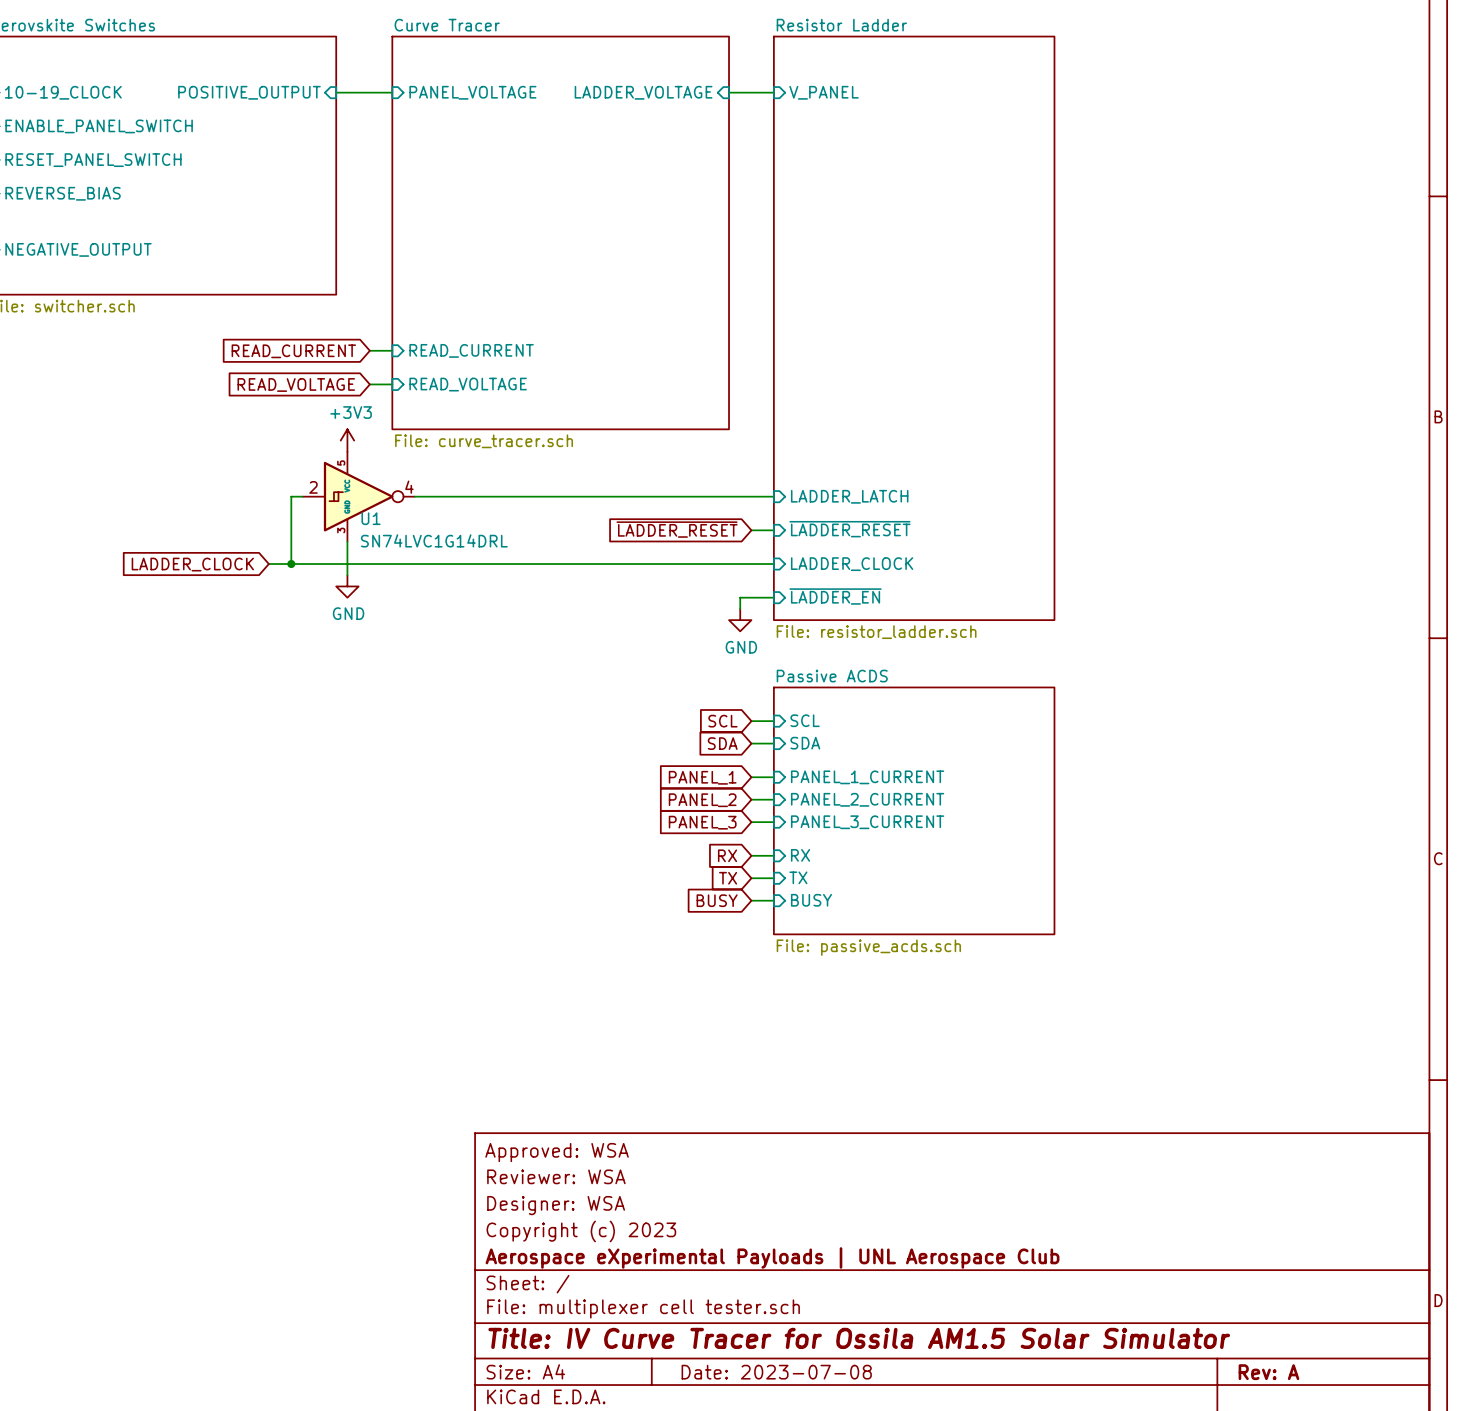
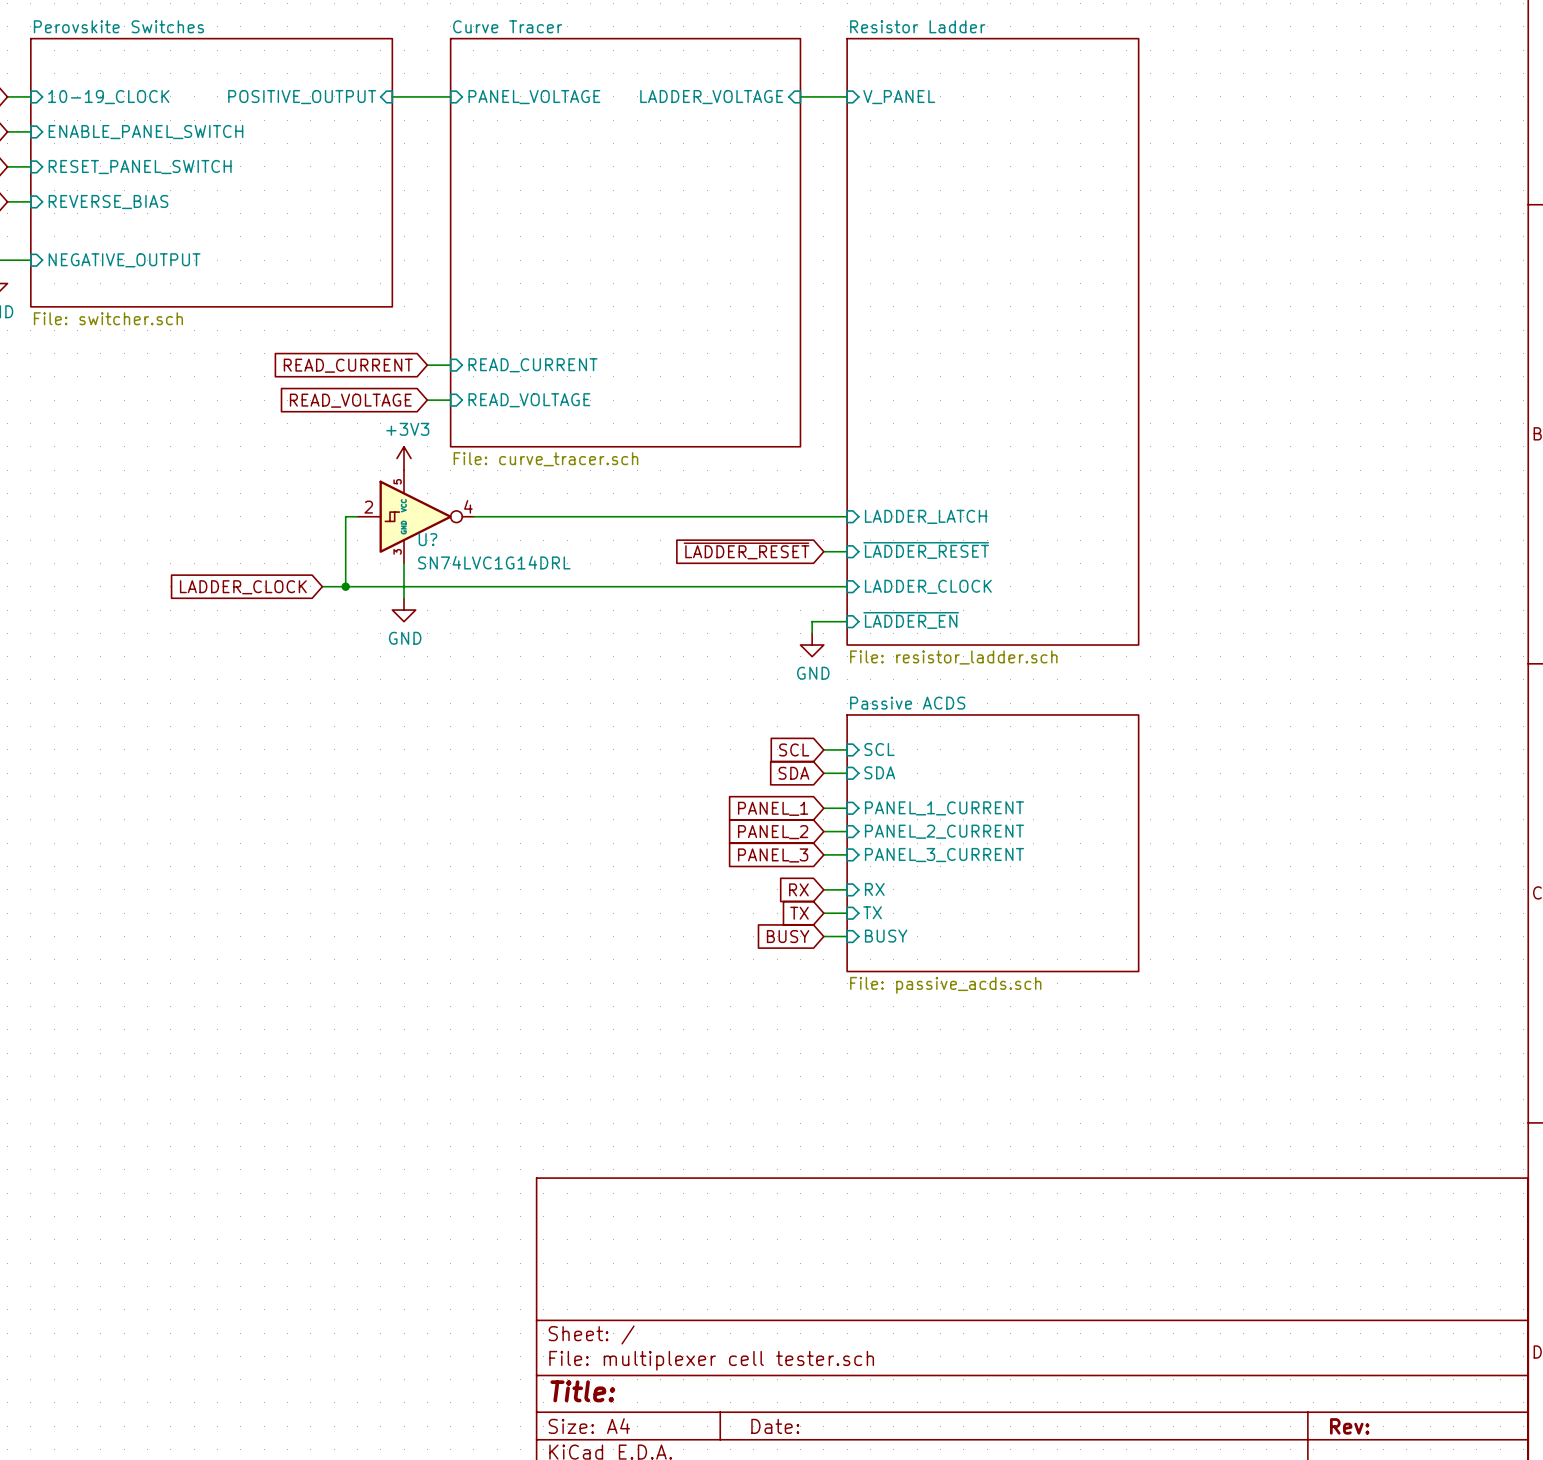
U1 name: U1 (371, 518) -> U? (427, 539)
title block: Approved: WSA (557, 1152) -> none
title block: Reviewer: WSA (556, 1176) -> none
title block: Designer: WSA (556, 1205) -> none
title block: Copyright (c) 2023 (581, 1231) -> none
title block: Aerospace eXperimental Payloads | UNL Aerospace Club (772, 1257) -> none
title block: Title: IV Curve Tracer for Ossila AM1.5 Solar Simulator (859, 1338) -> Title: (582, 1391)
title block: Date: 2023-07-08 (776, 1372) -> Date: (775, 1426)
title block: Rev: A (1268, 1372) -> Rev: (1349, 1426)

